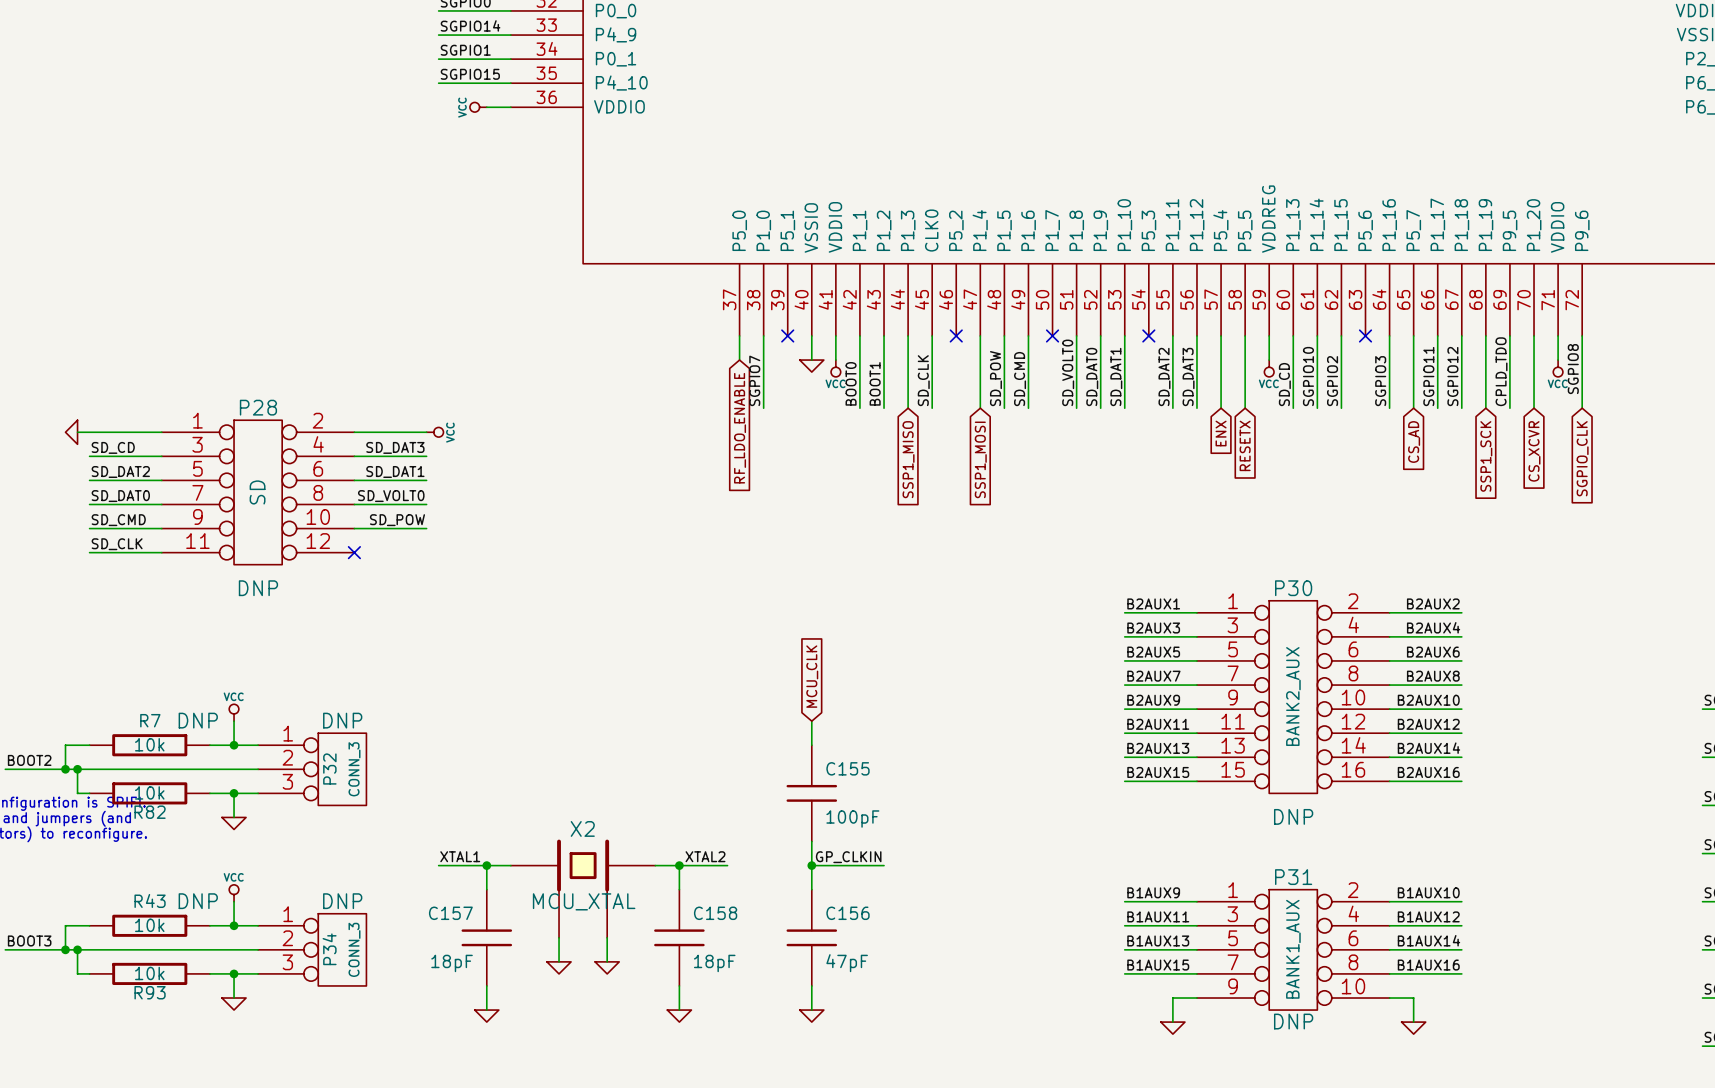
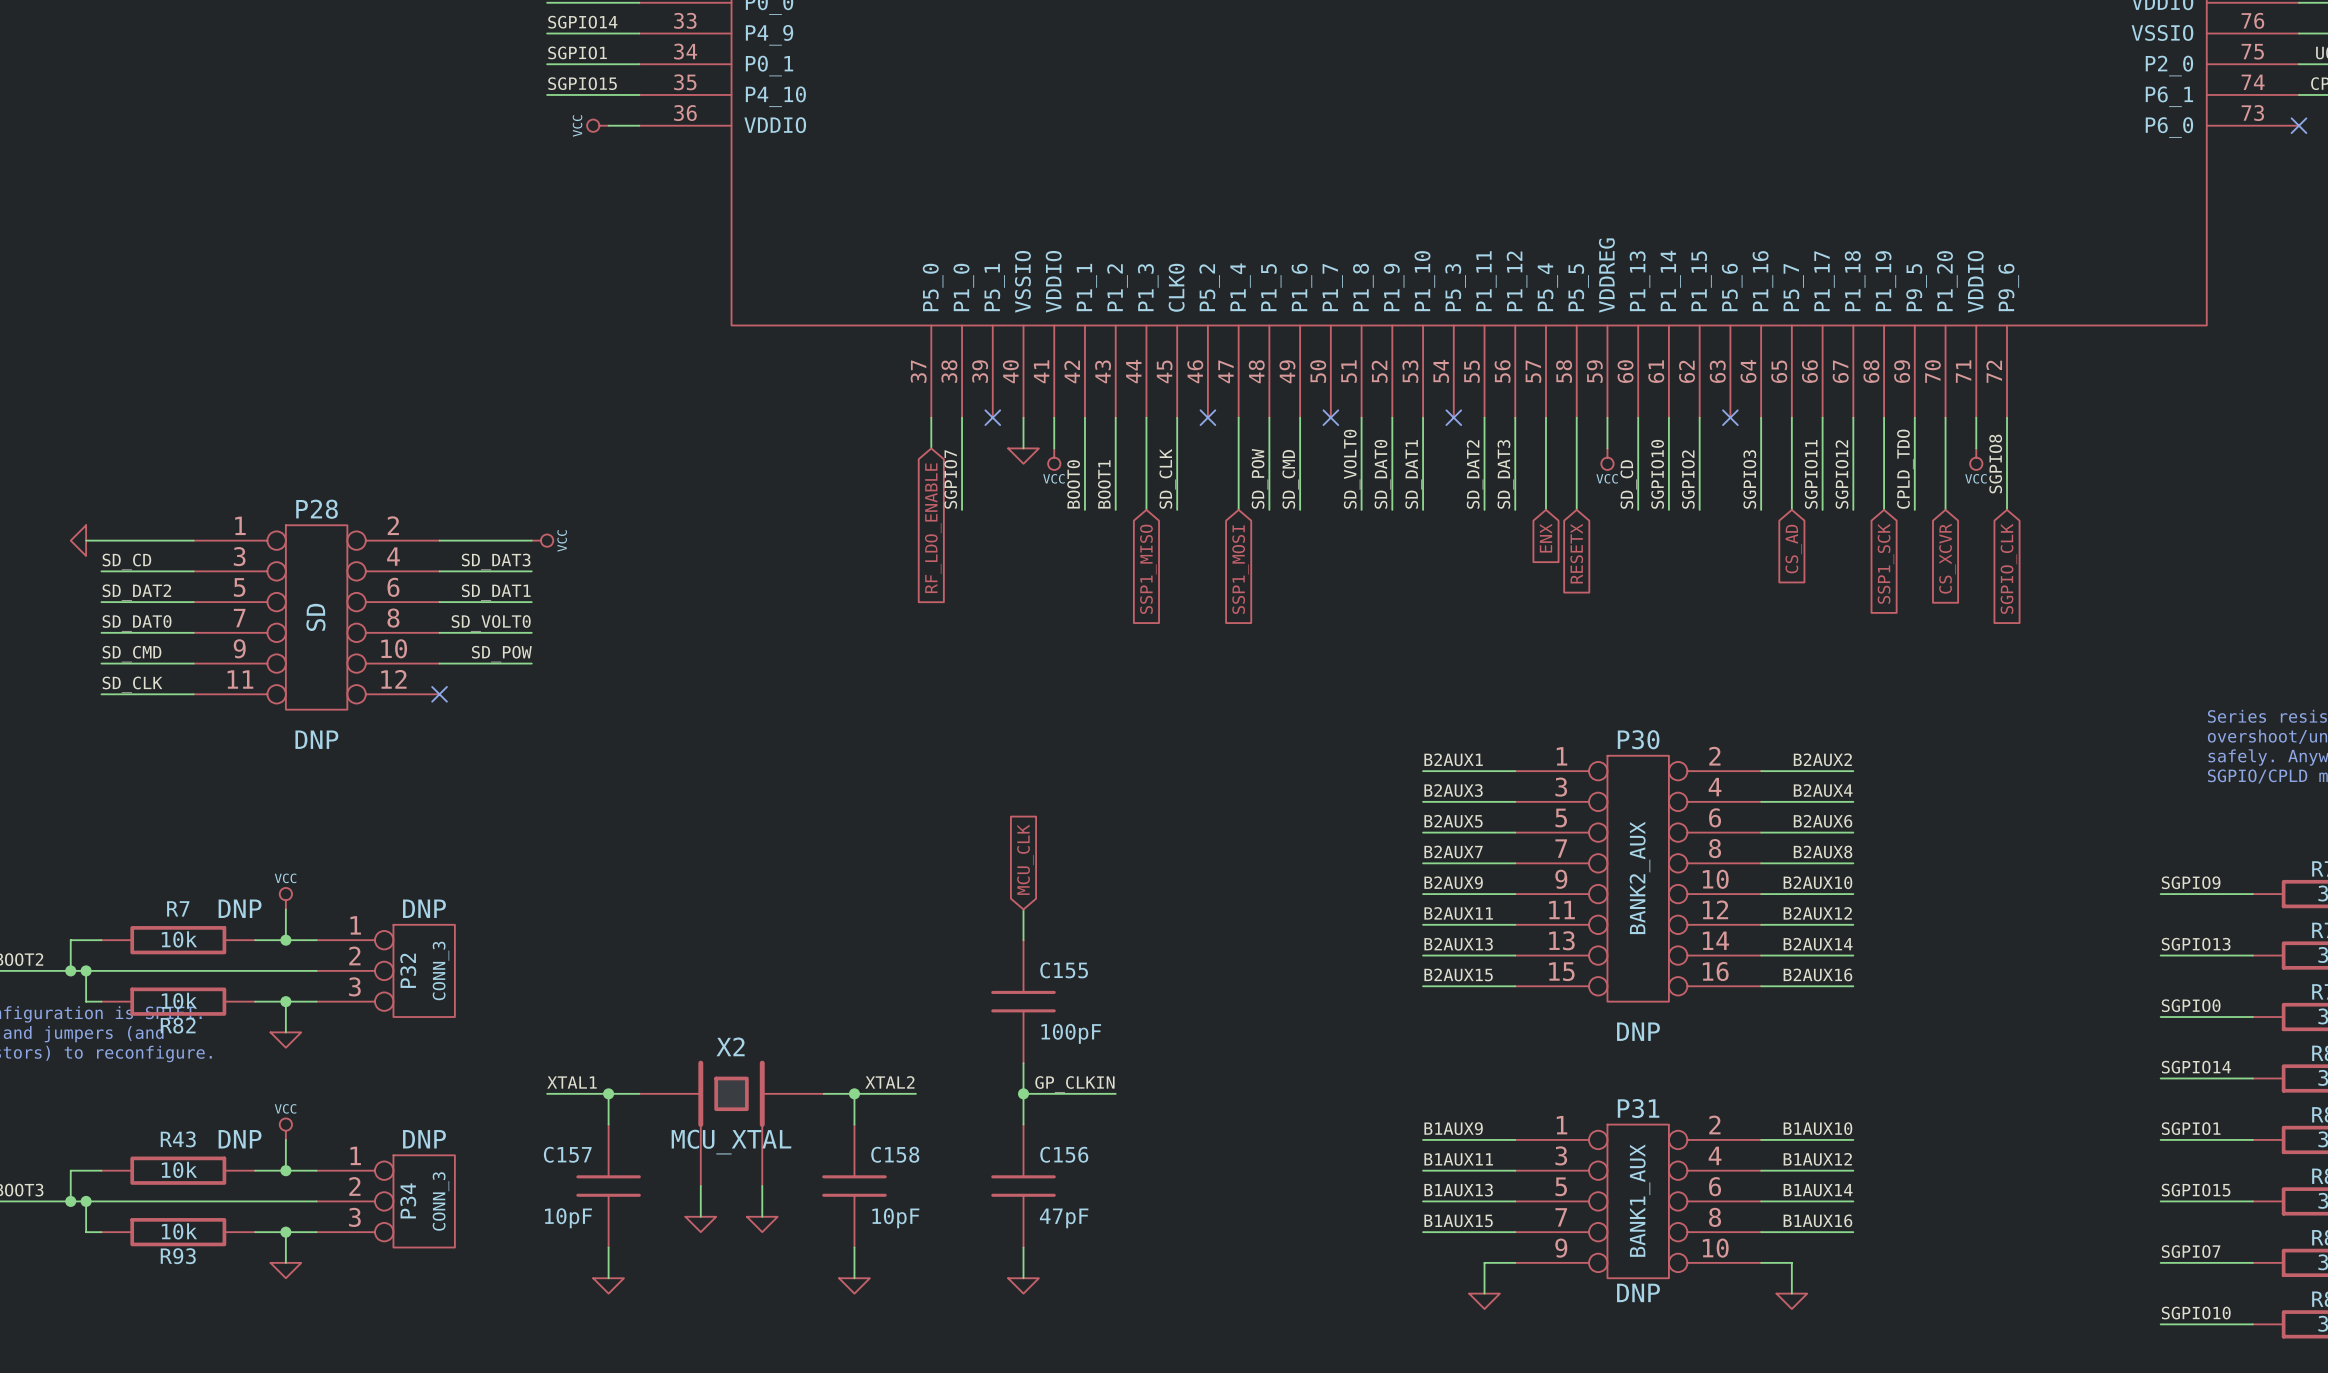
C157 value: 18pF (452, 963) -> 10pF (568, 1218)
C158 value: 18pF (714, 963) -> 10pF (895, 1218)

